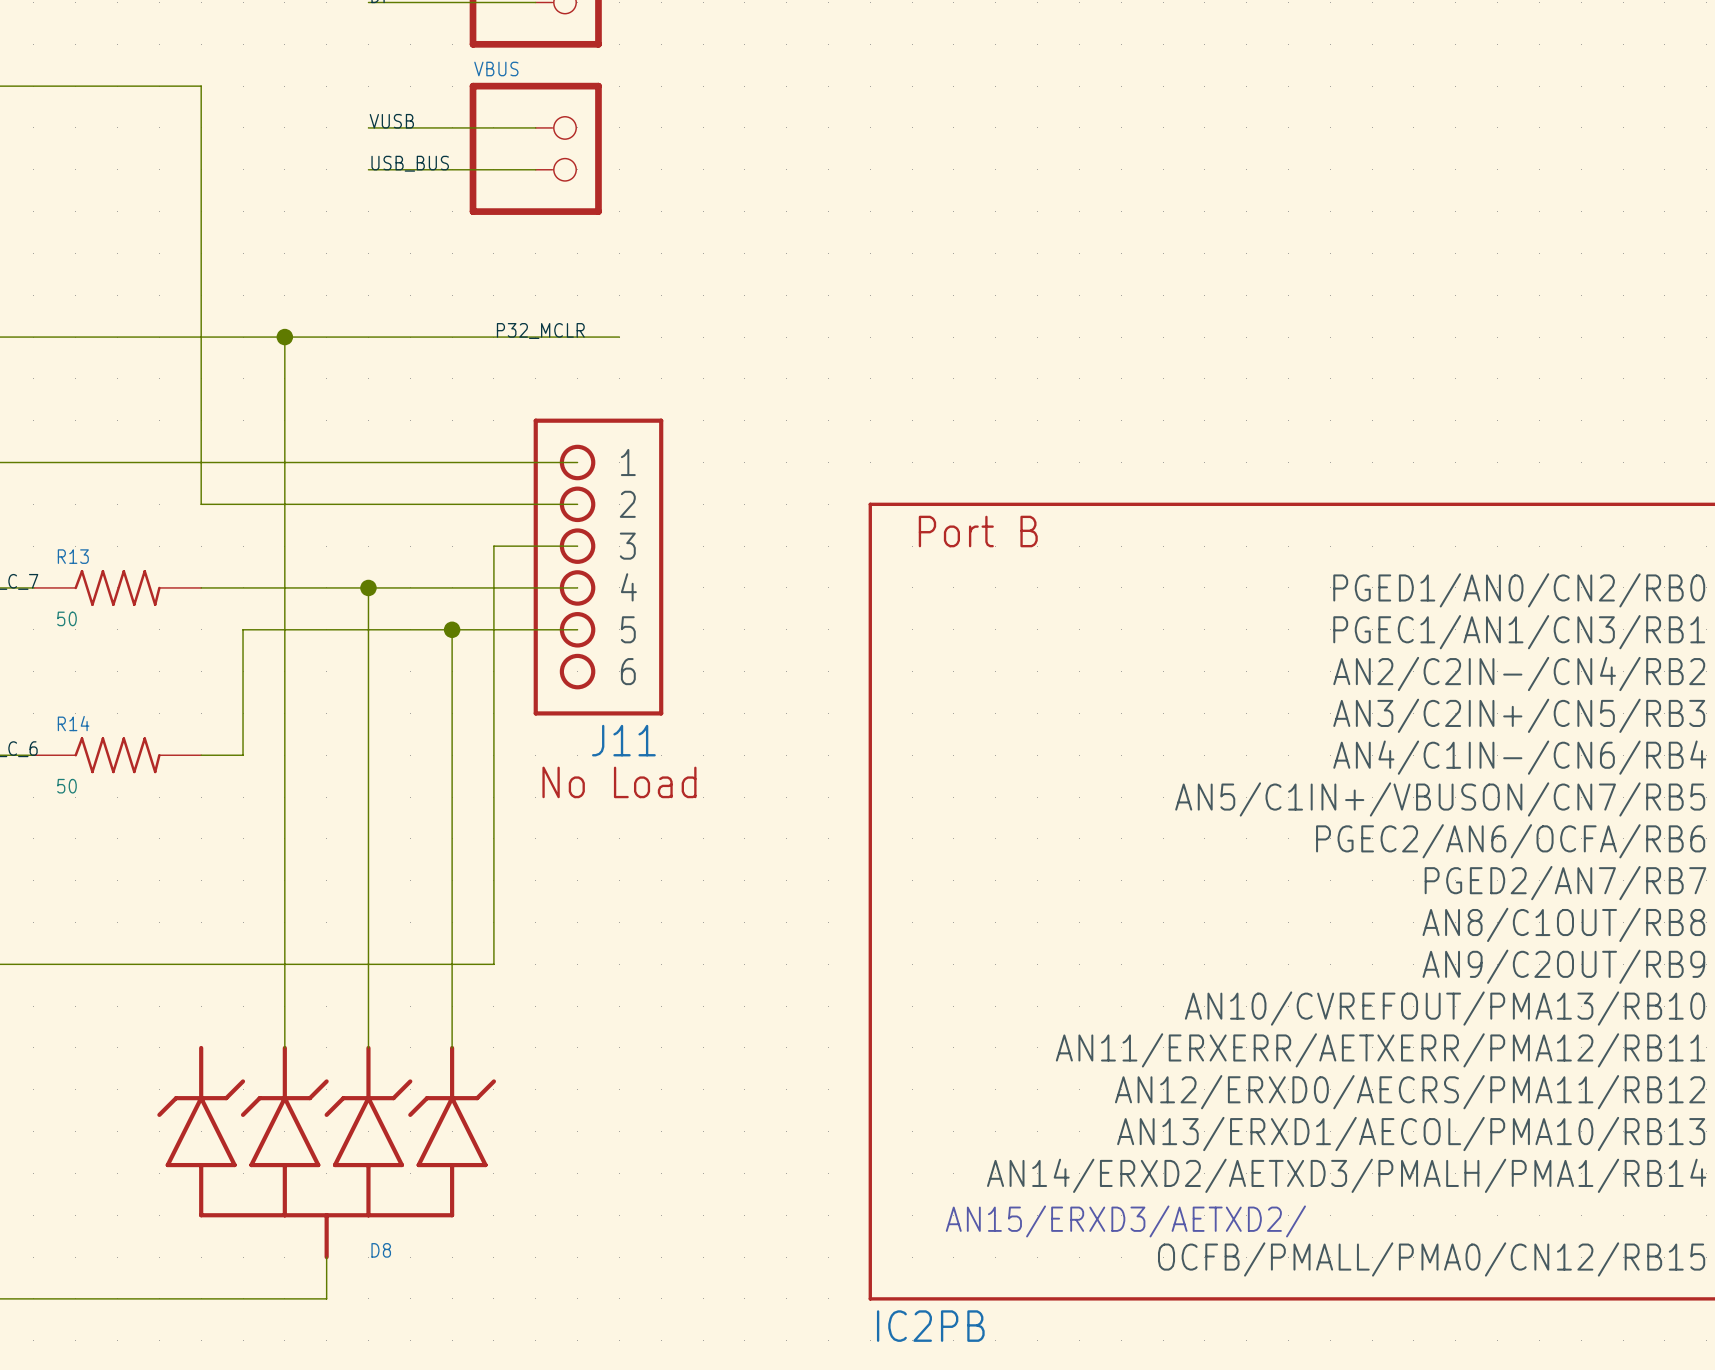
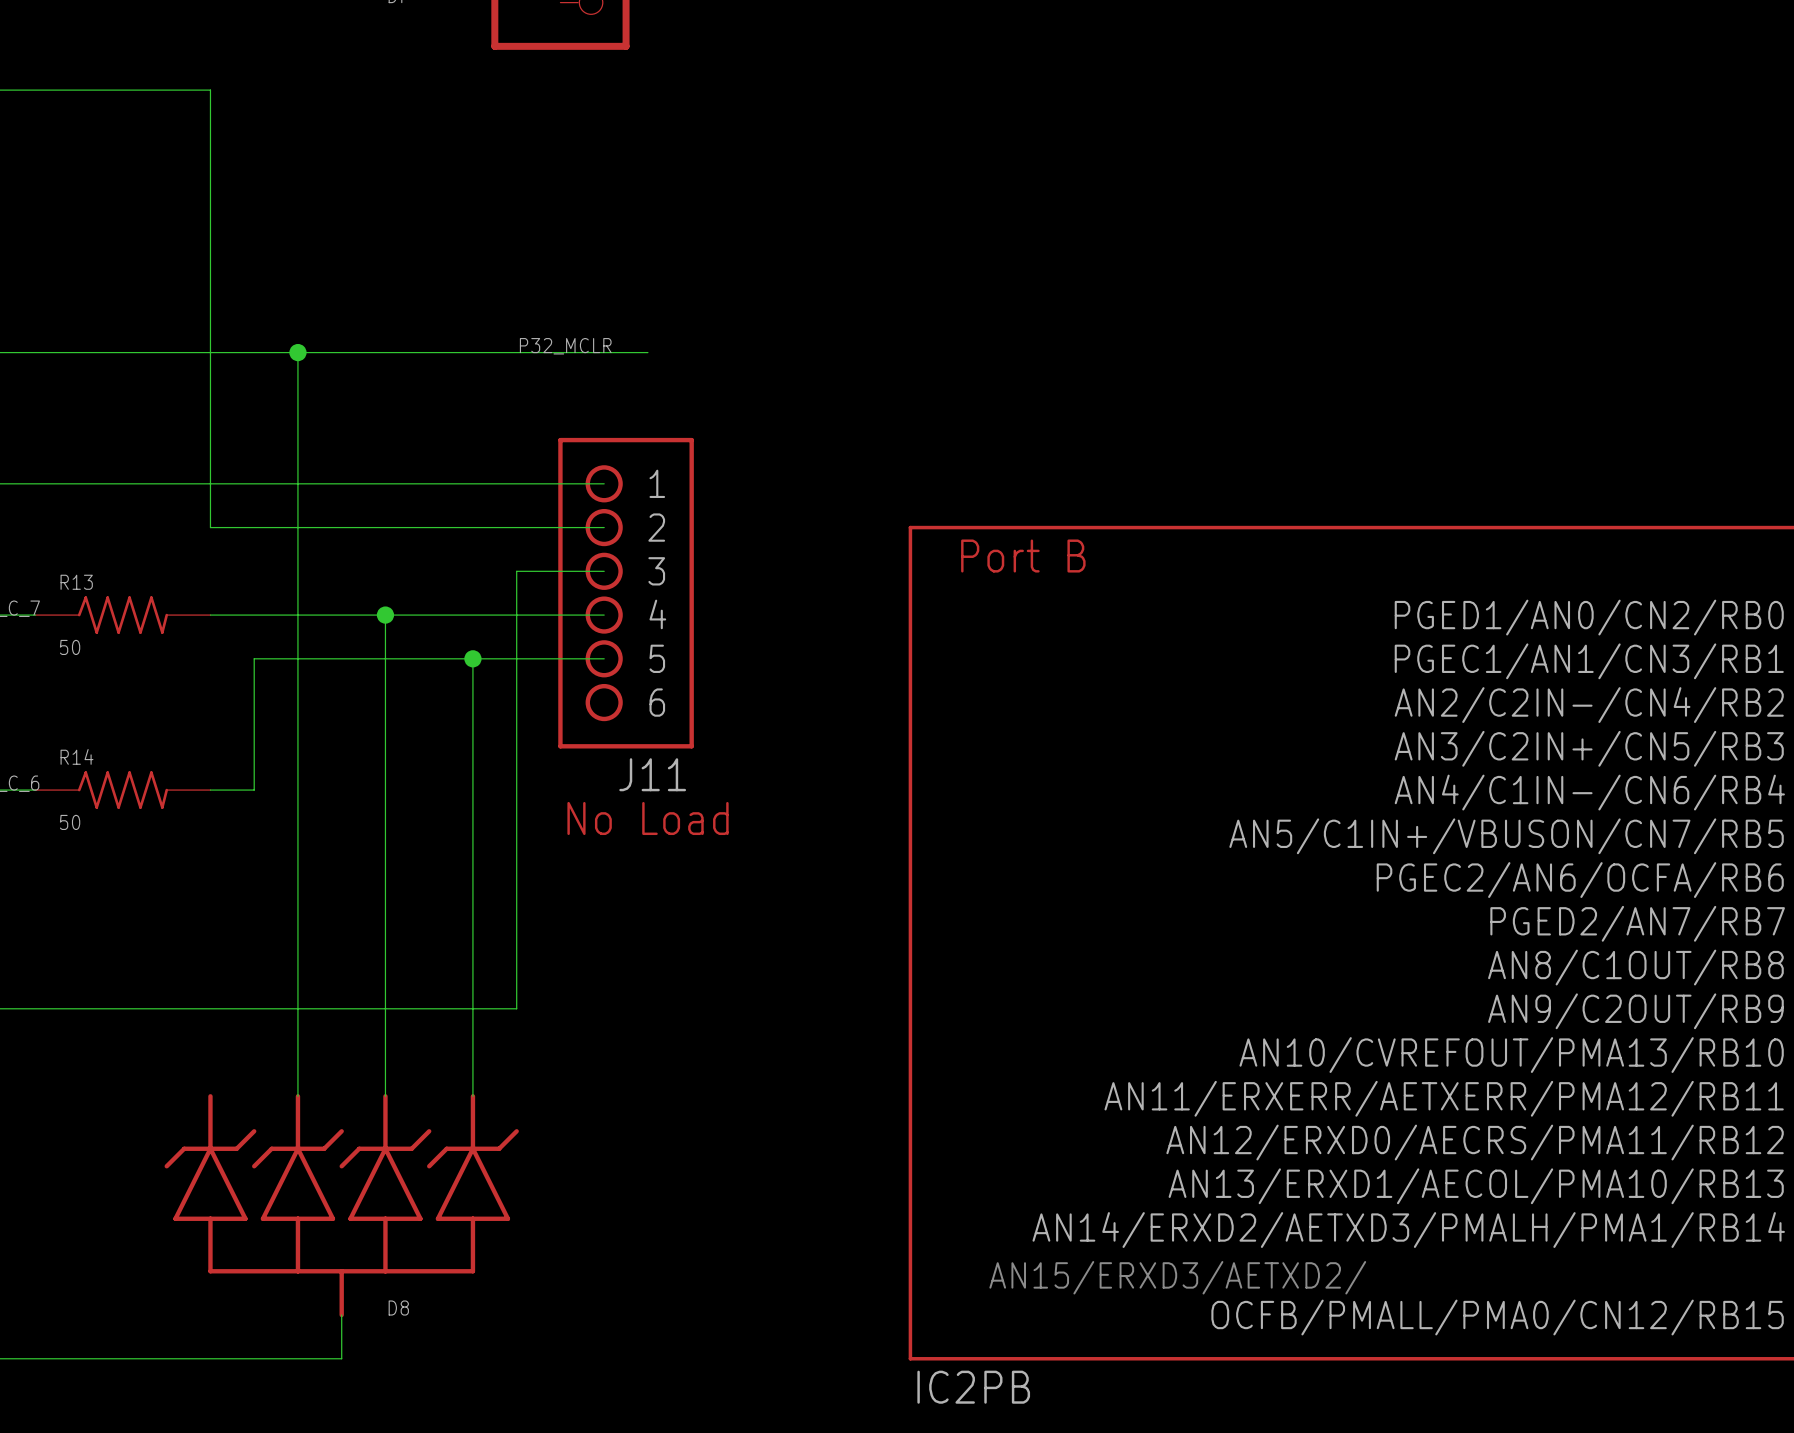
wire: (368, 2) (535, 2) -> none
label: VUSB (391, 121) -> none
wire: (368, 127) (535, 127) -> none
VBUS: (535, 148) -> none
label: USB_BUS (410, 163) -> none
wire: (368, 169) (535, 169) -> none

